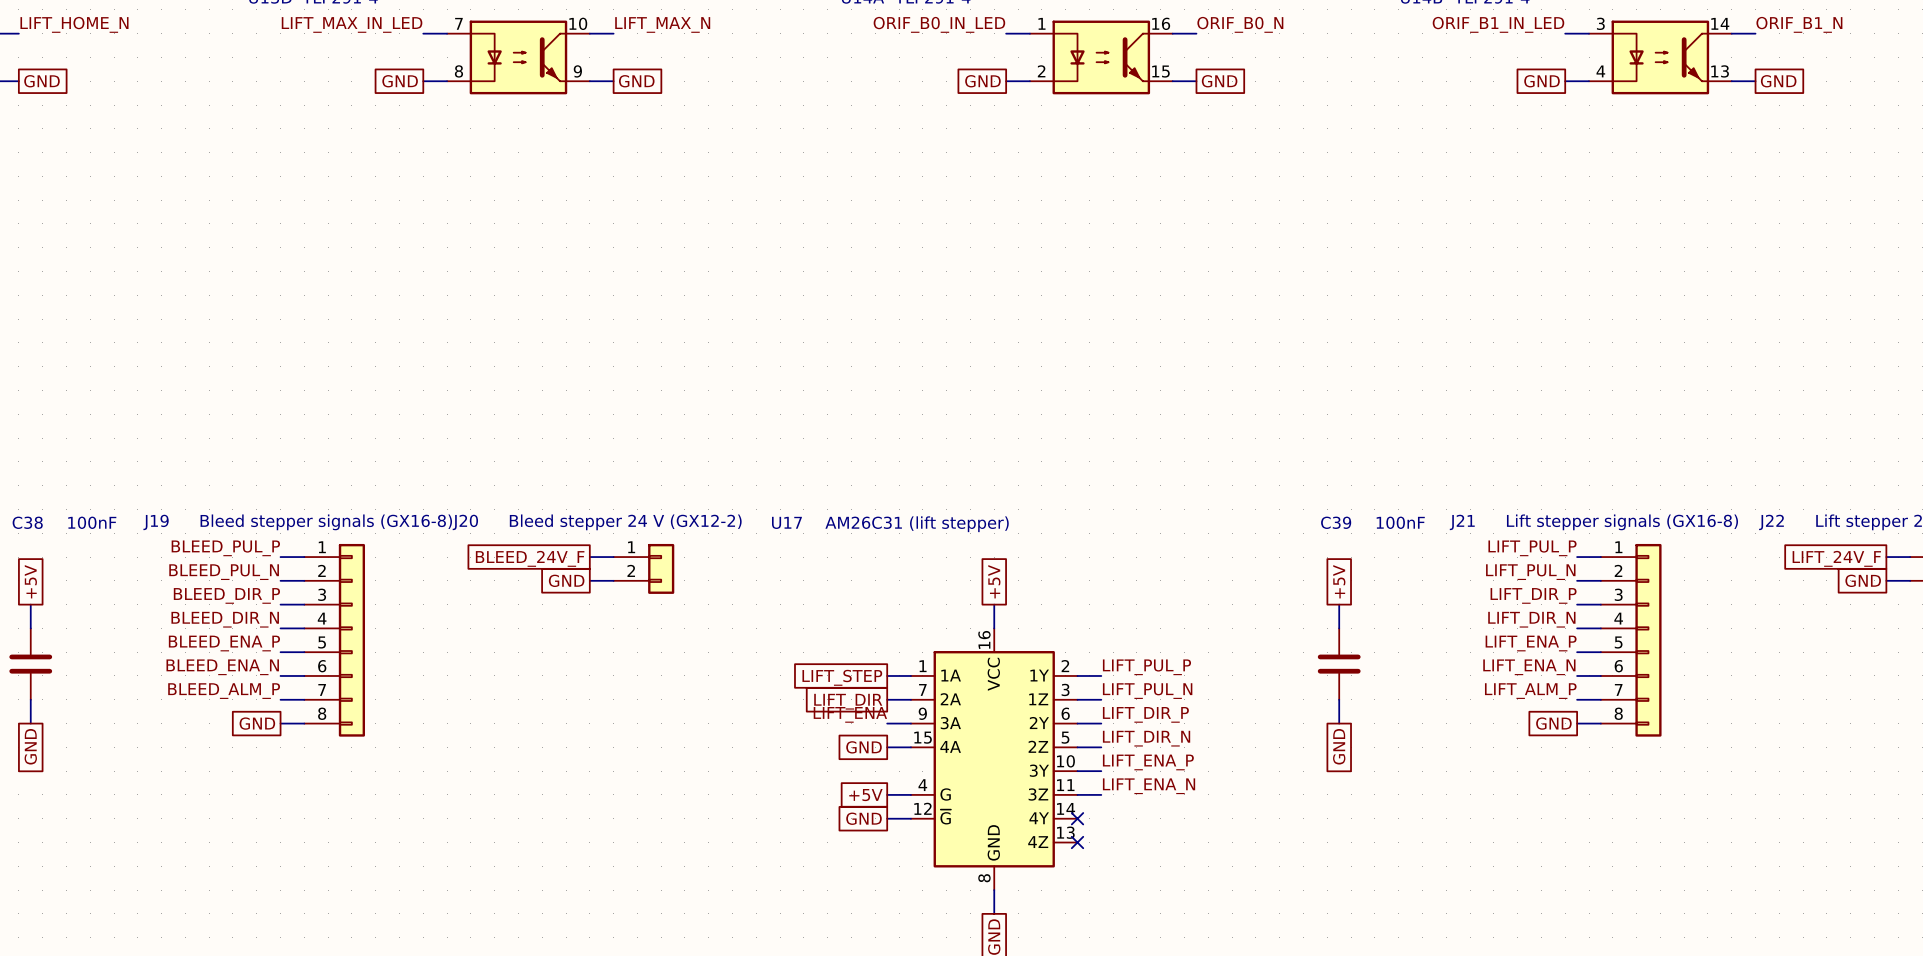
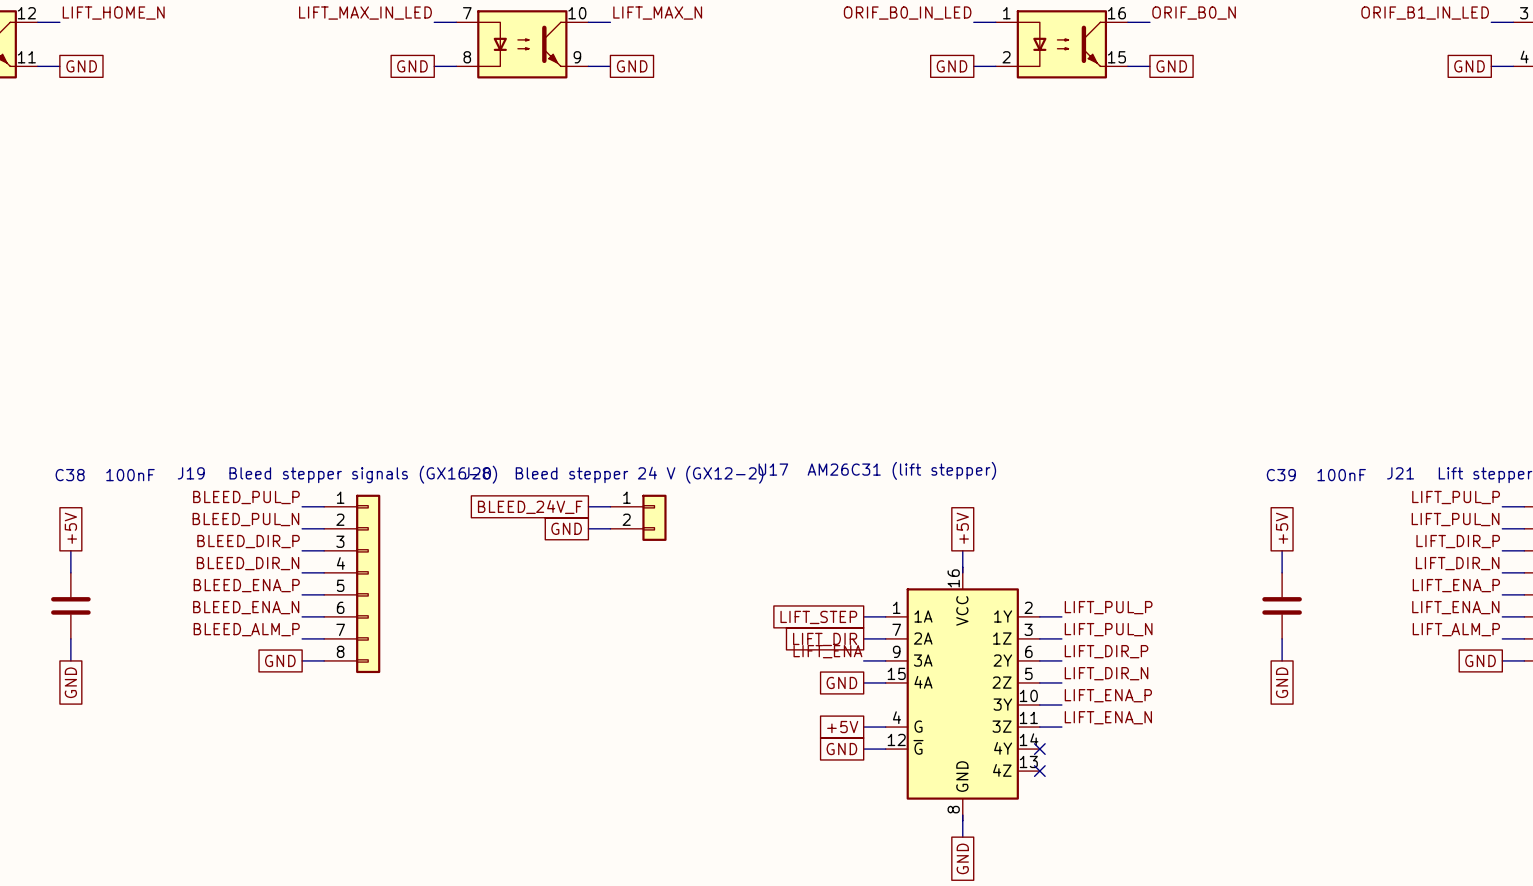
U17 symbol: [910, 628, 1078, 891] -> [885, 567, 1040, 821]

